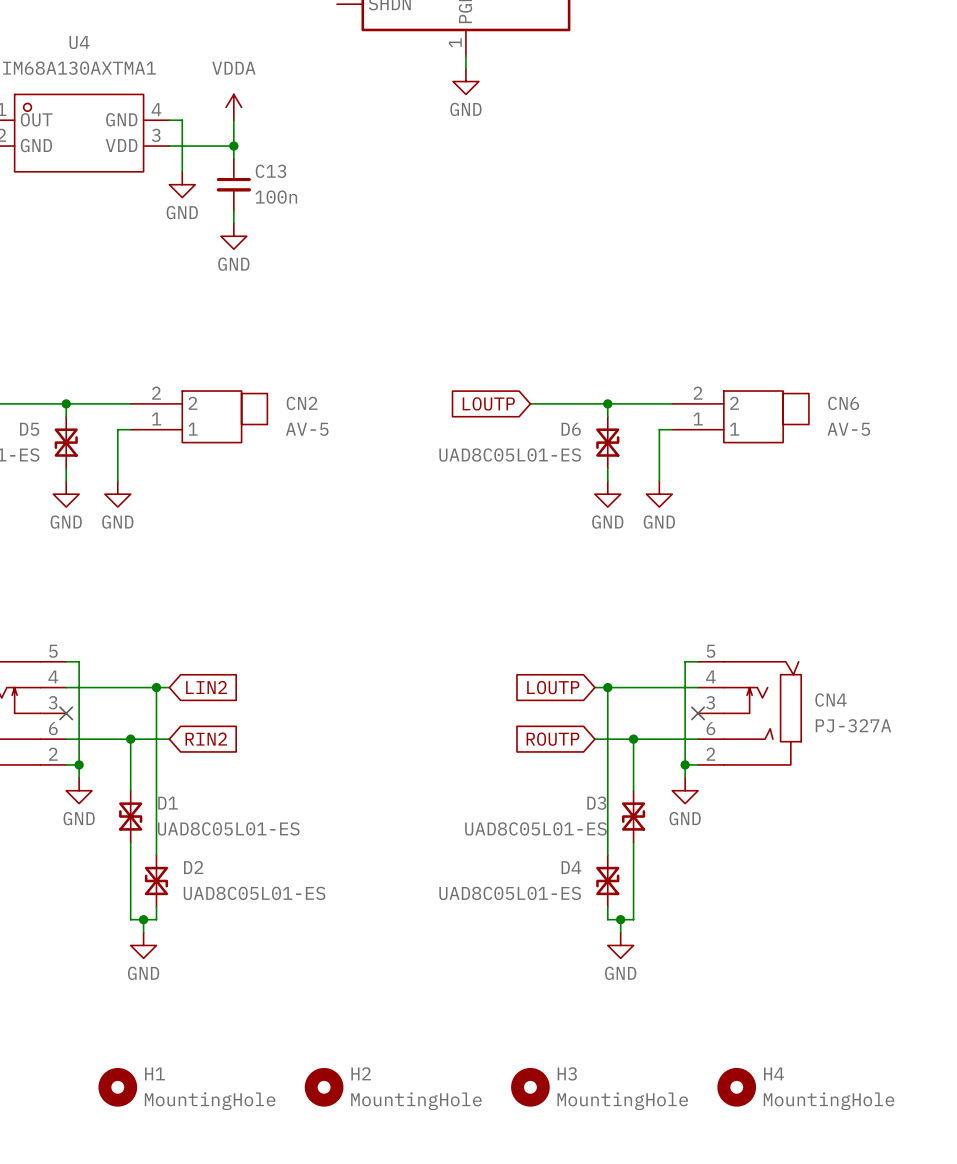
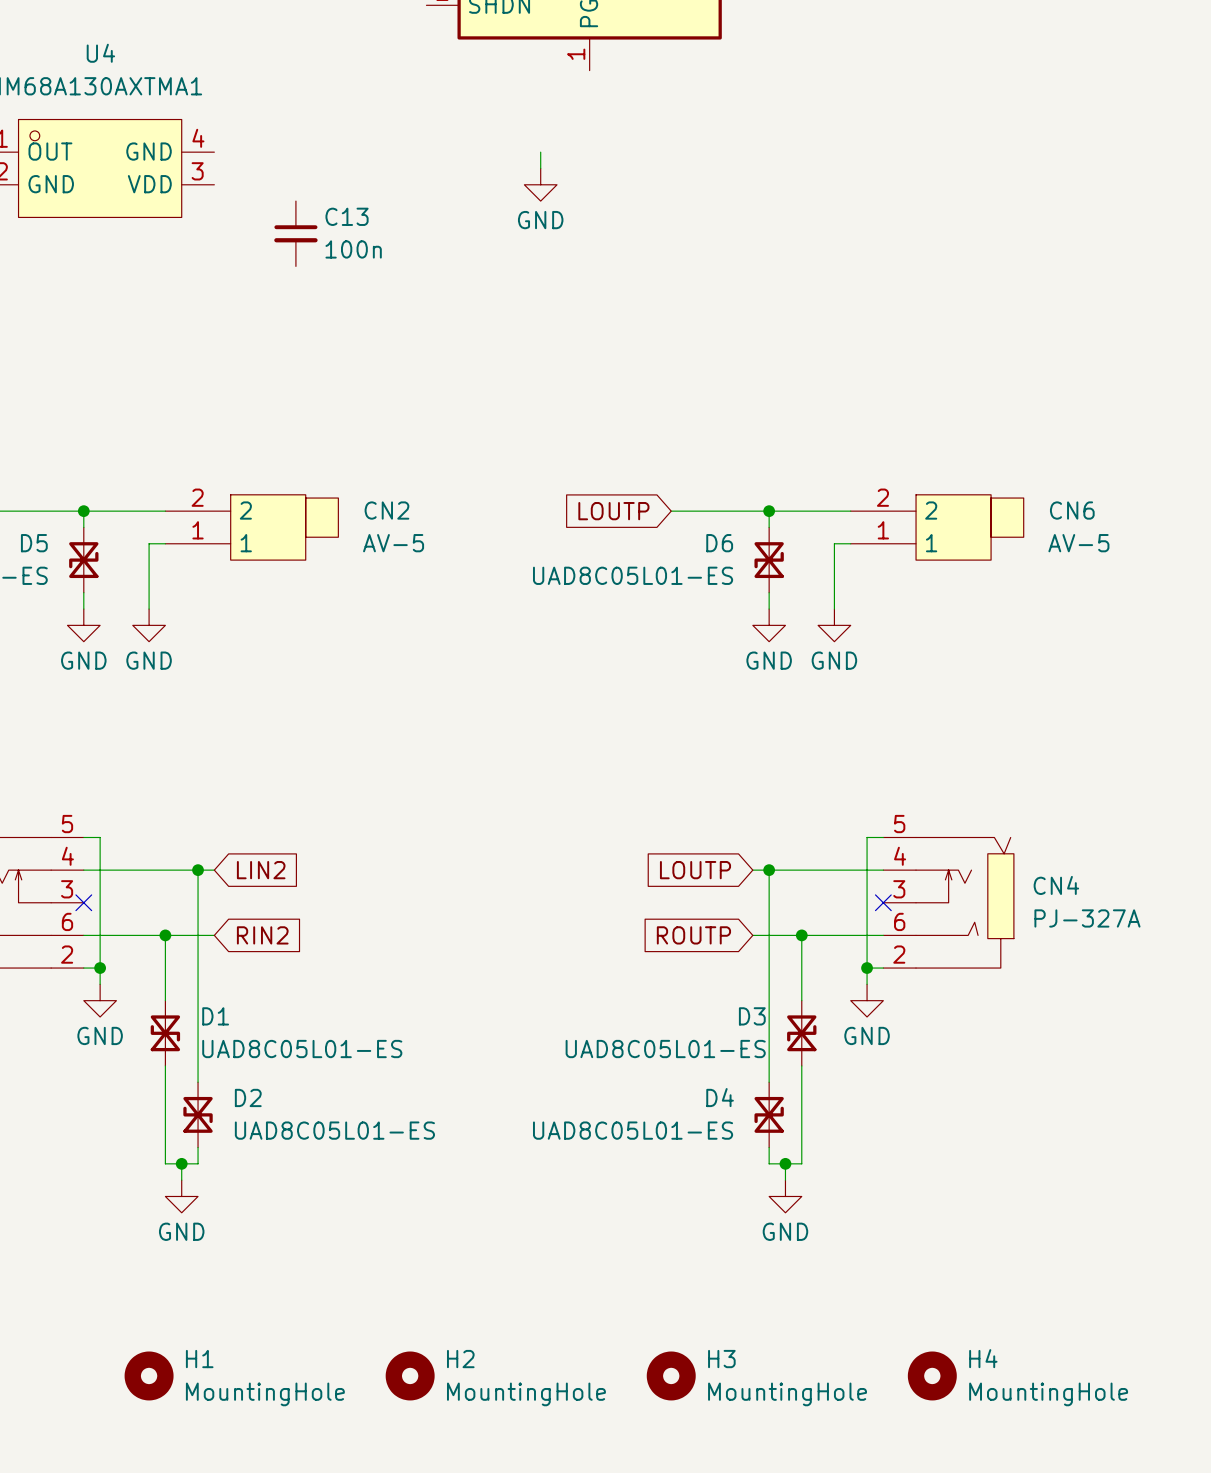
wire: (465, 55) (465, 68) -> (540, 152) (540, 168)
power symbol position: GND (465, 81) -> GND (540, 184)
power symbol: VDDA (233, 107) -> none
wire: (169, 120) (182, 120) (182, 171) -> none
wire: (233, 120) (233, 158) -> none
wire: (169, 146) (233, 146) -> none
junction: (233, 146) -> none
power symbol: GND (182, 184) -> none
wire: (233, 210) (233, 223) -> none
power symbol: GND (233, 236) -> none

